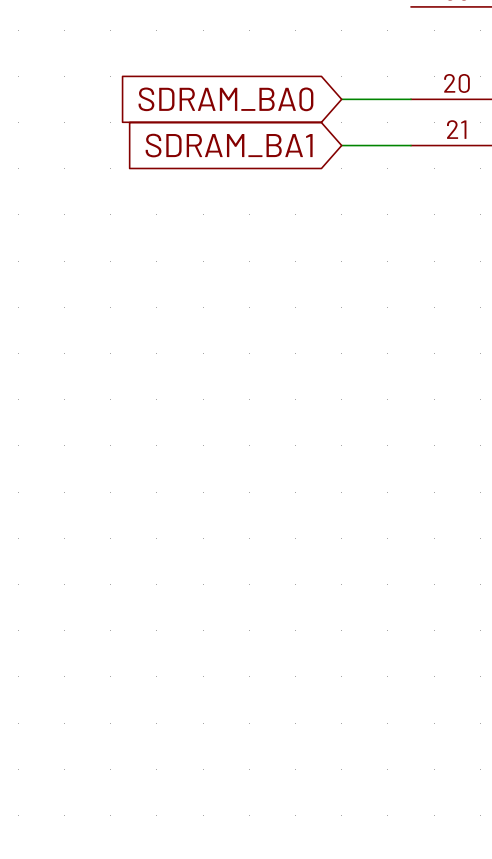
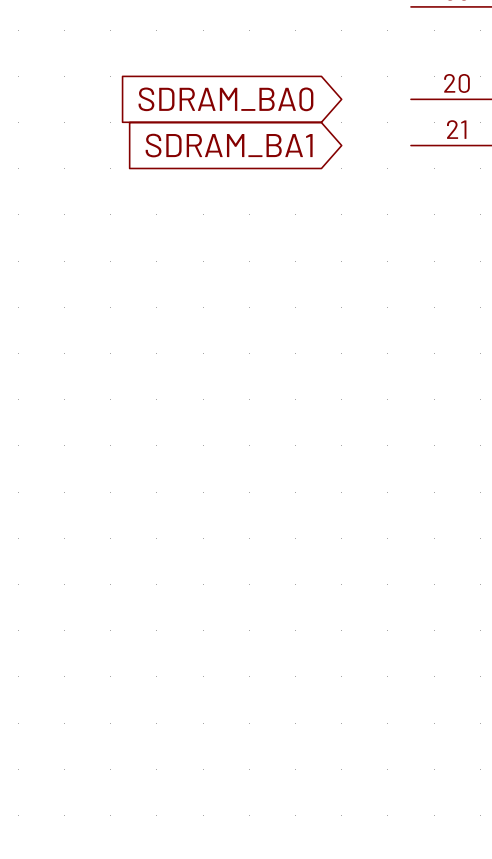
wire: (341, 99) (410, 99) -> none
wire: (341, 145) (410, 145) -> none

